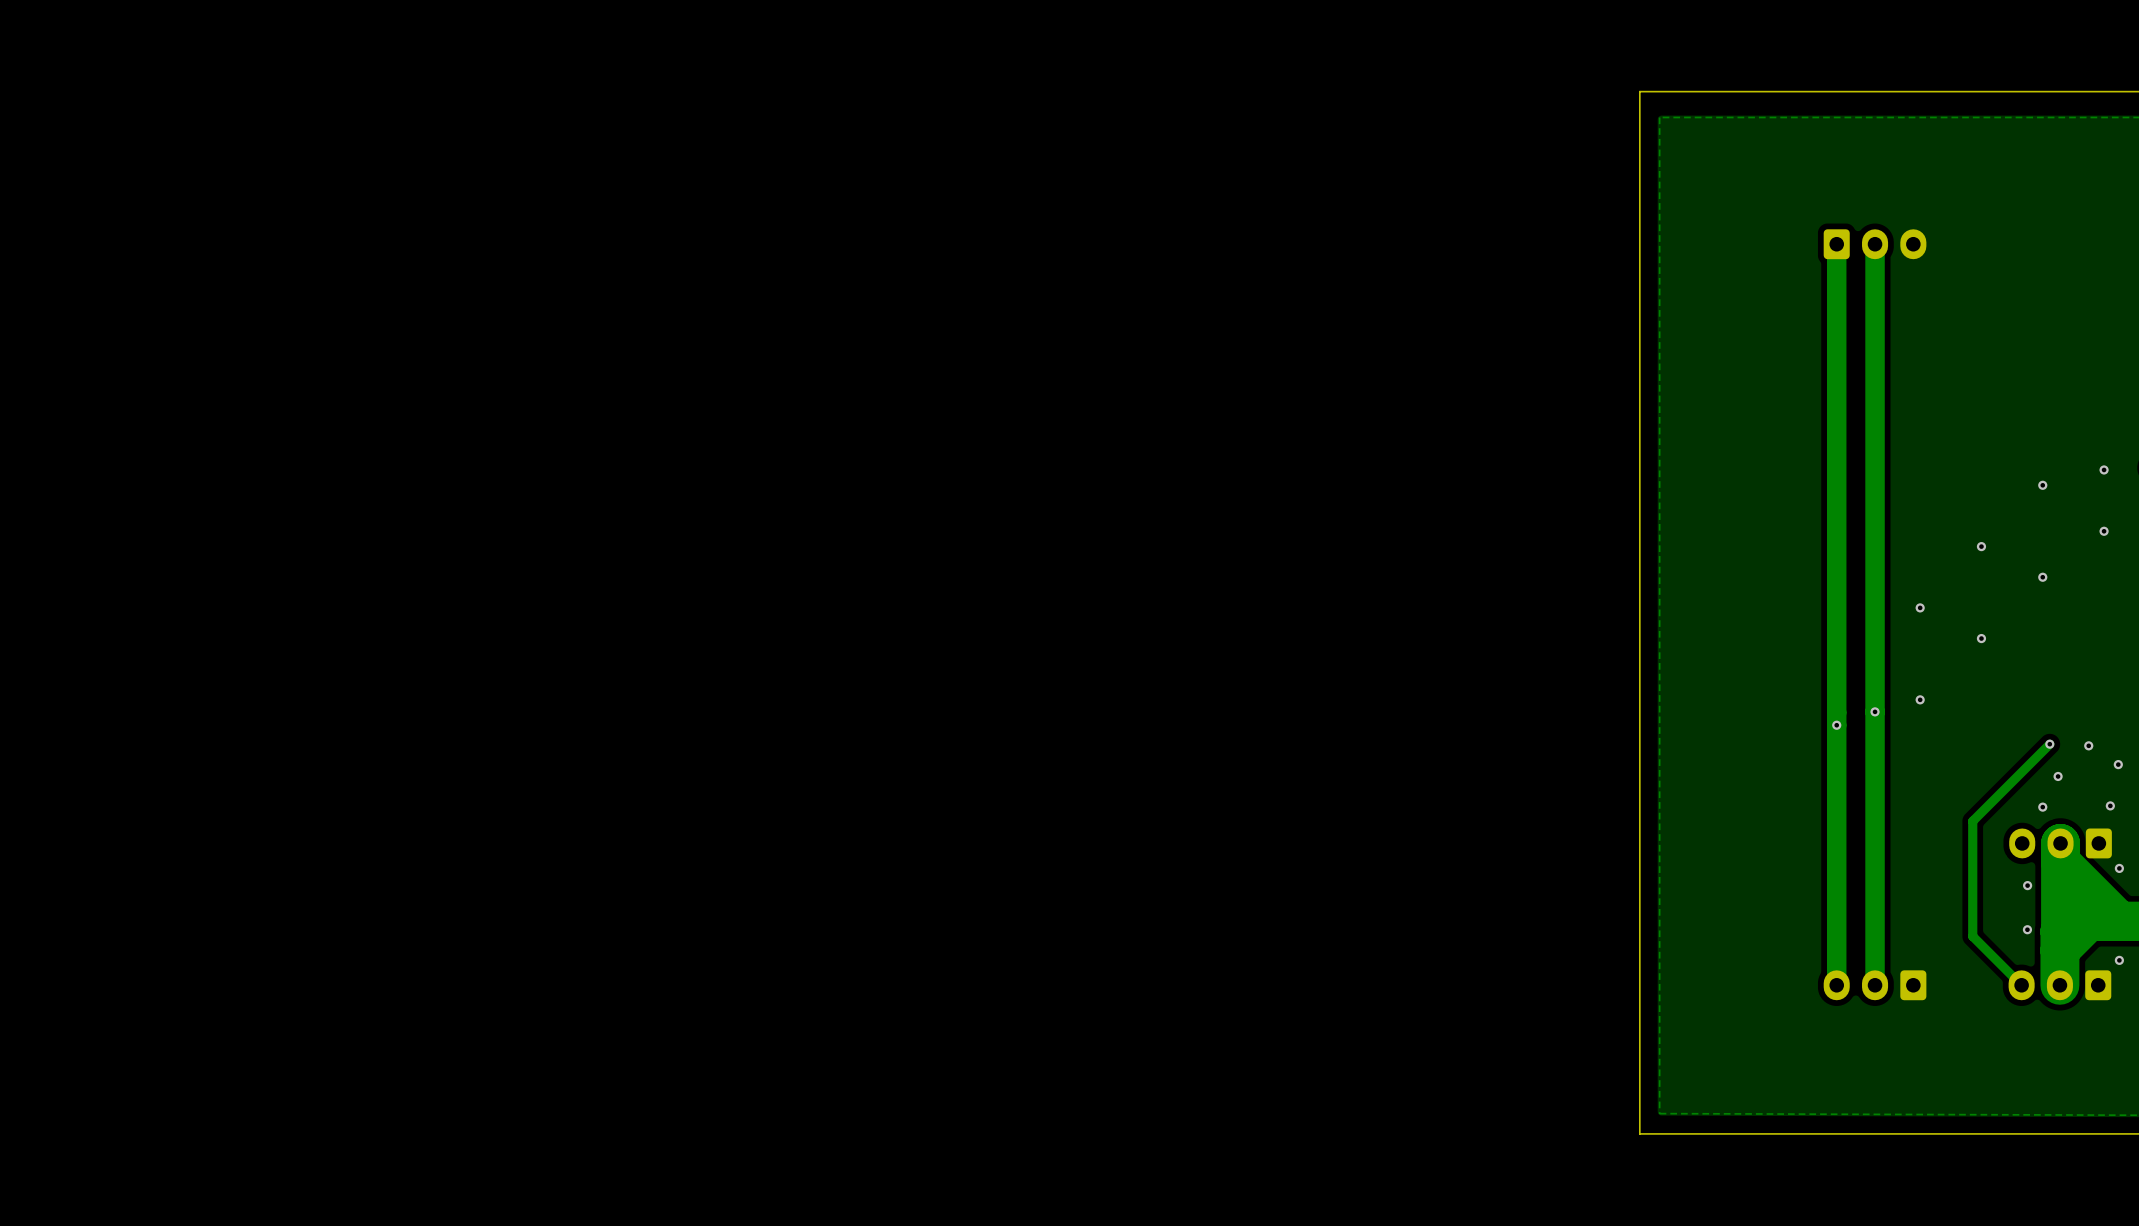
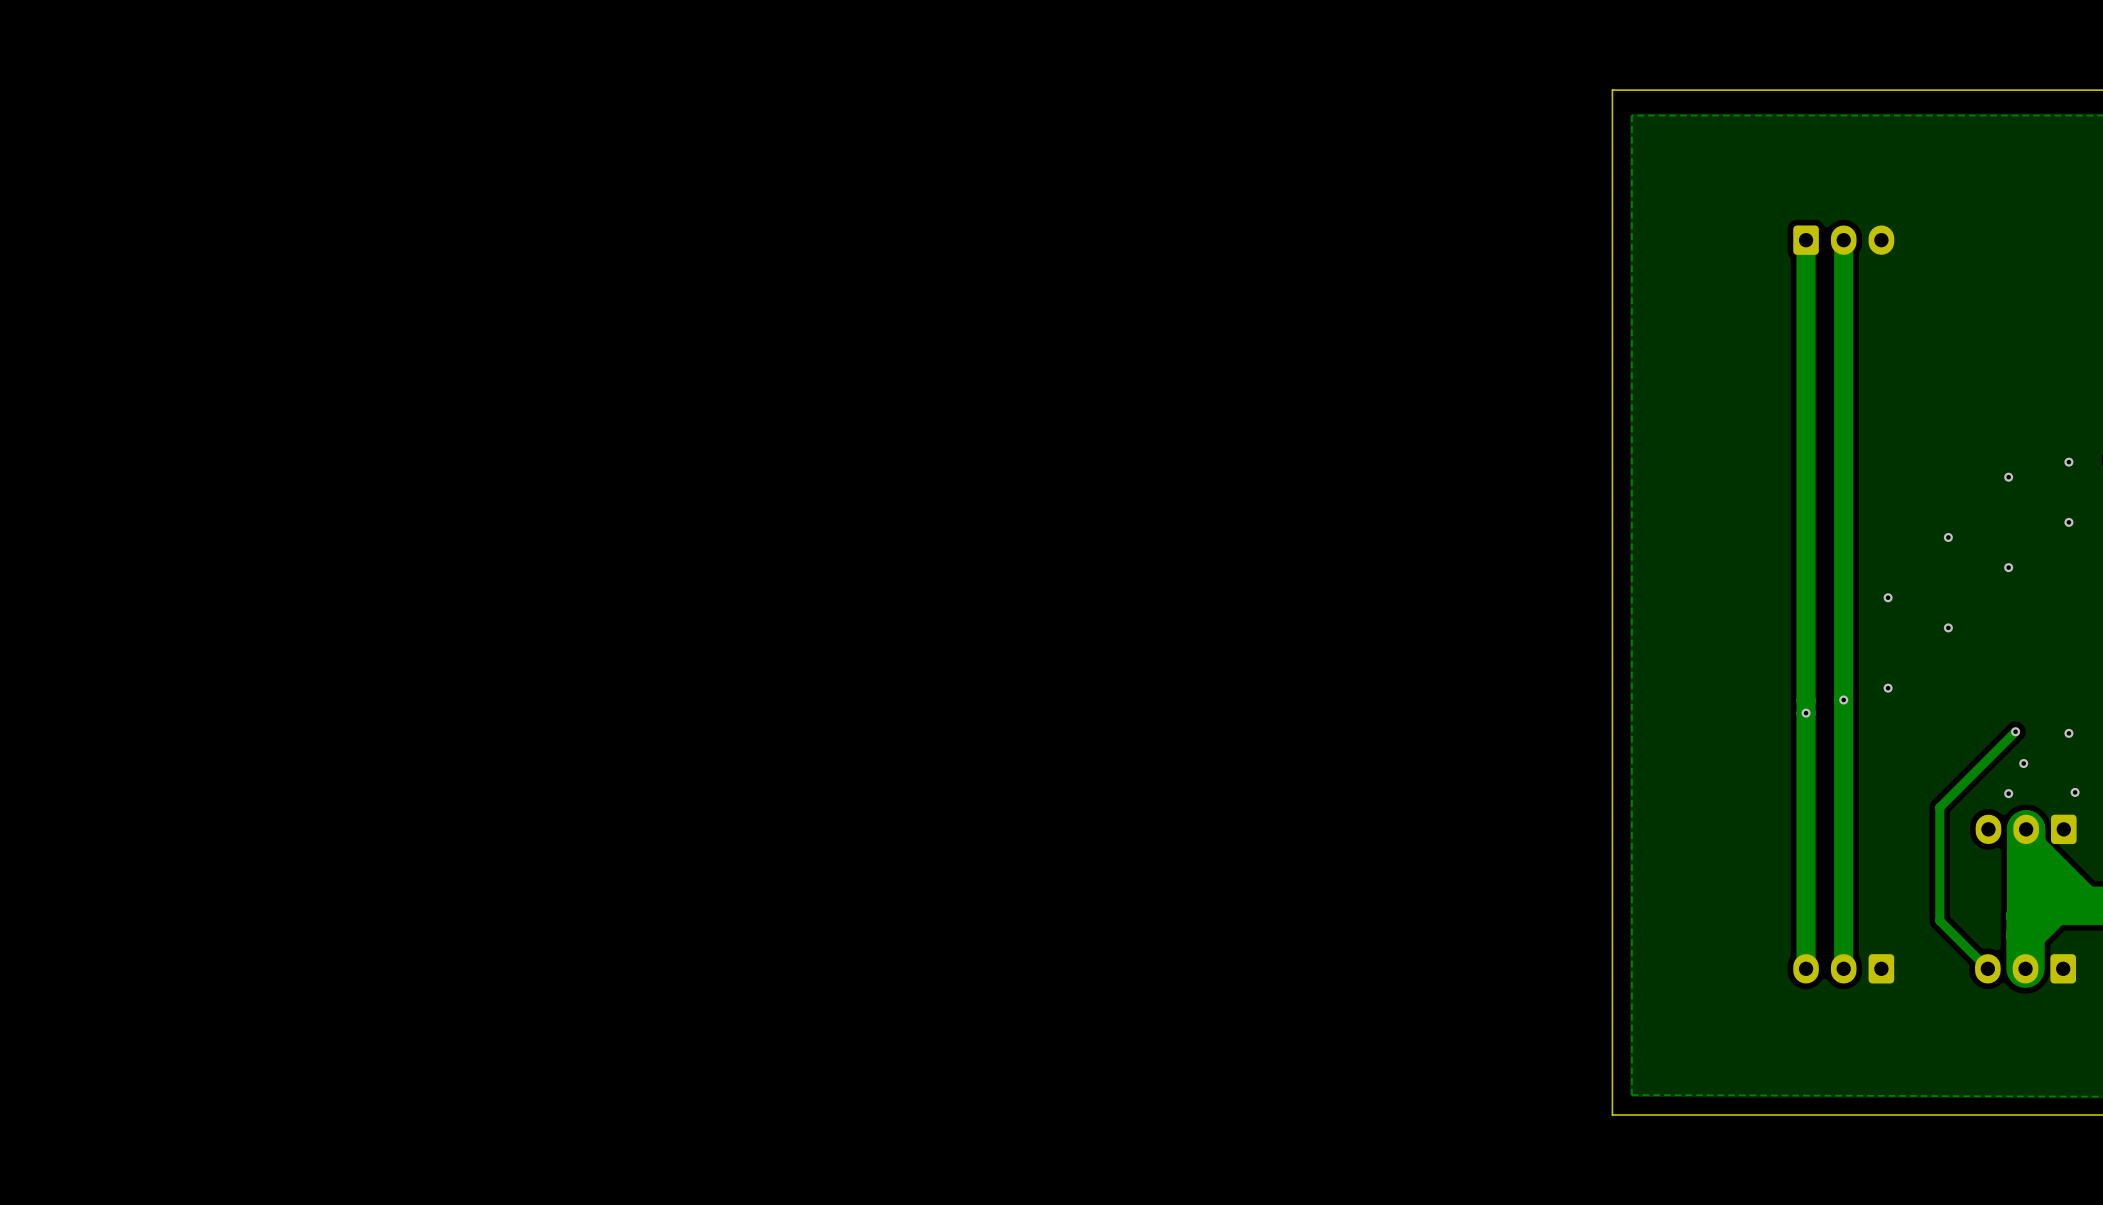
via: (2088, 745) -> none
via: none -> (2068, 733)
via: (2118, 764) -> none
via: (2119, 868) -> none
via: (2027, 885) -> none
via: (2027, 929) -> none
via: (2119, 960) -> none

